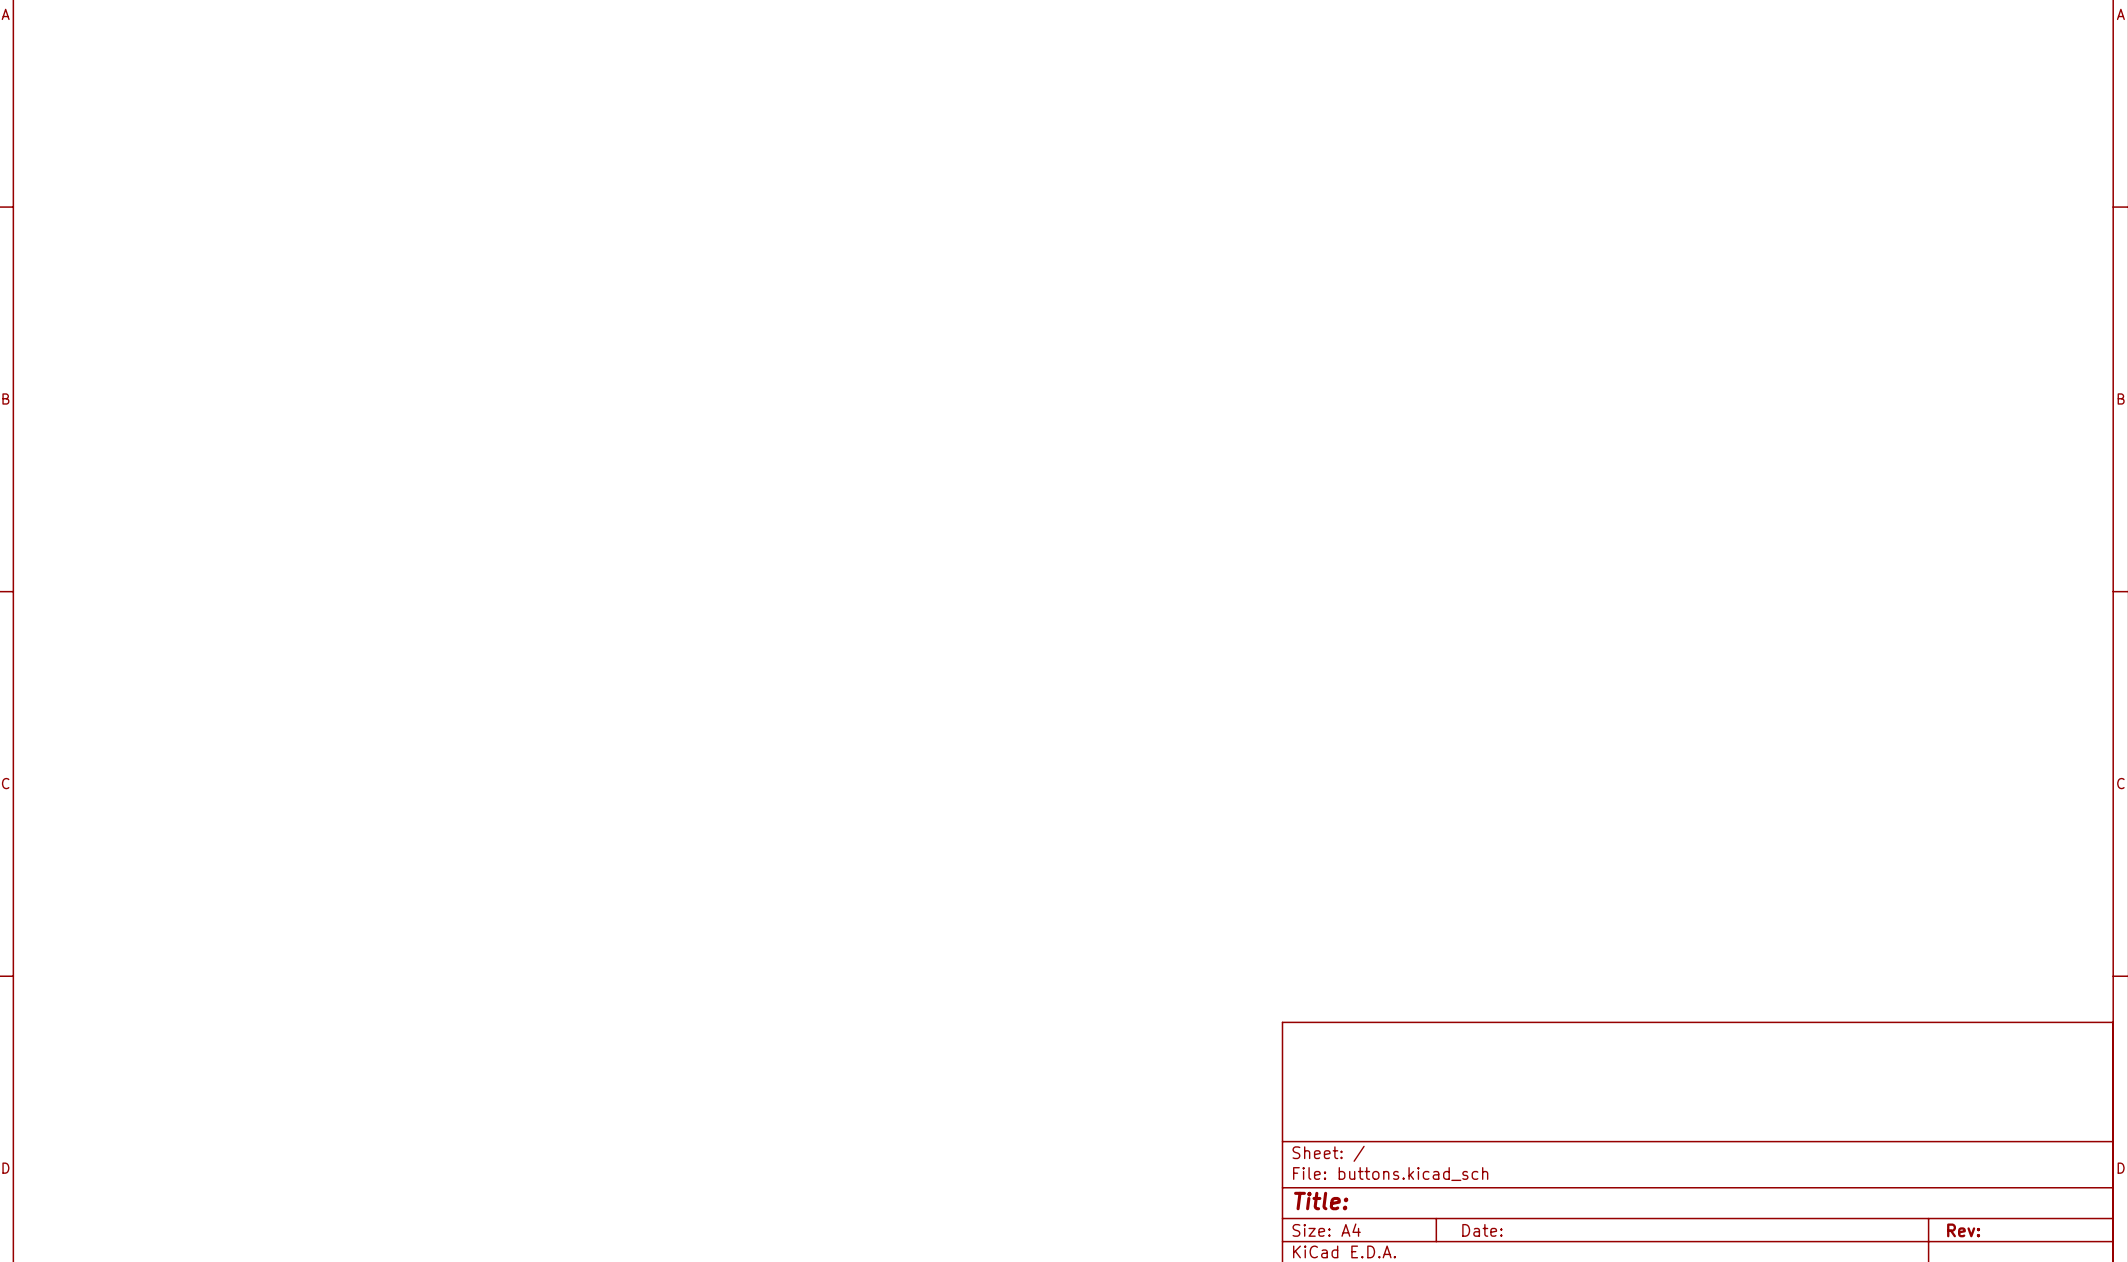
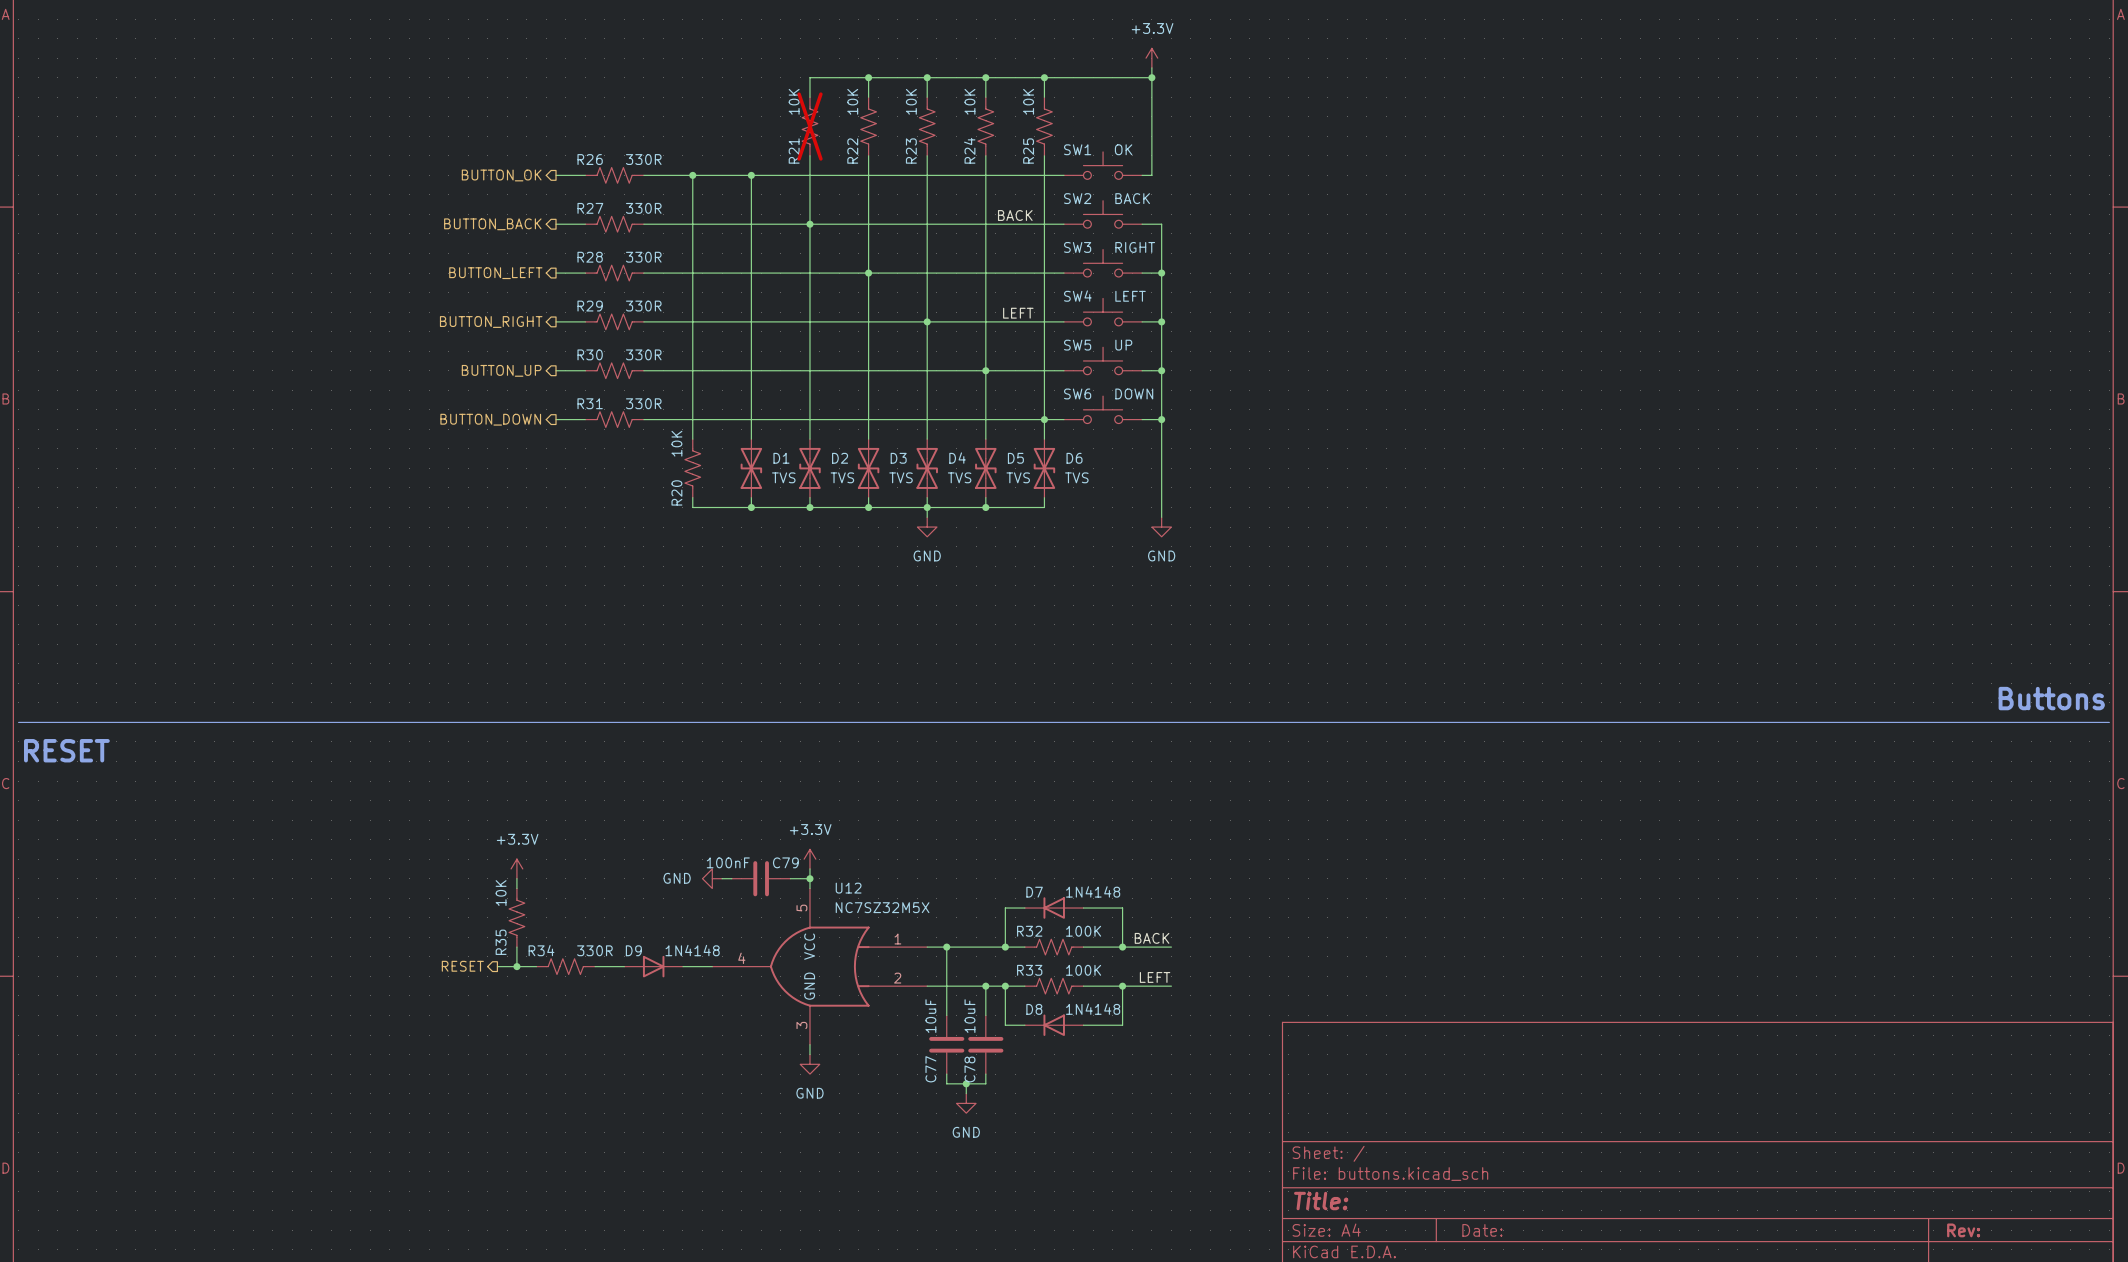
power symbol: none -> +3.3V (1151, 58)
wire: none -> (1151, 67) (1151, 175) (1142, 175)
wire: none -> (868, 77) (868, 97)
junction: none -> (868, 77)
wire: none -> (927, 77) (927, 97)
junction: none -> (927, 77)
wire: none -> (985, 77) (985, 97)
junction: none -> (985, 77)
wire: none -> (1044, 77) (1044, 97)
junction: none -> (1044, 77)
wire: none -> (1151, 77) (809, 77) (809, 97)
junction: none -> (1151, 77)
R21: none -> 10K (809, 126)
R22: none -> 10K (868, 126)
R23: none -> 10K (927, 126)
R24: none -> 10K (985, 126)
R25: none -> 10K (1044, 126)
wire: none -> (809, 155) (809, 439)
wire: none -> (868, 155) (868, 439)
wire: none -> (927, 155) (927, 439)
wire: none -> (985, 155) (985, 439)
wire: none -> (1044, 155) (1044, 439)
SW1: none -> OK (1103, 165)
hierarchical label: none -> BUTTON_OK (501, 175)
wire: none -> (556, 175) (585, 175)
R26: none -> 330R (614, 175)
wire: none -> (643, 175) (1063, 175)
wire: none -> (692, 175) (692, 439)
junction: none -> (692, 175)
wire: none -> (751, 175) (751, 439)
junction: none -> (751, 175)
SW2: none -> BACK (1103, 214)
label: none -> BACK (1015, 215)
hierarchical label: none -> BUTTON_BACK (492, 224)
wire: none -> (556, 224) (585, 224)
R27: none -> 330R (614, 224)
wire: none -> (643, 224) (1063, 224)
junction: none -> (809, 224)
wire: none -> (1142, 224) (1161, 224) (1161, 517)
SW3: none -> RIGHT (1103, 263)
hierarchical label: none -> BUTTON_LEFT (495, 273)
wire: none -> (556, 273) (585, 273)
R28: none -> 330R (614, 273)
wire: none -> (643, 273) (1063, 273)
junction: none -> (868, 273)
wire: none -> (1142, 273) (1161, 273)
junction: none -> (1161, 273)
SW4: none -> LEFT (1103, 312)
label: none -> LEFT (1018, 313)
wire: none -> (556, 321) (585, 321)
R29: none -> 330R (614, 321)
wire: none -> (643, 321) (1063, 321)
junction: none -> (927, 321)
wire: none -> (1142, 321) (1161, 321)
junction: none -> (1161, 321)
hierarchical label: none -> BUTTON_RIGHT (491, 322)
SW5: none -> UP (1103, 360)
hierarchical label: none -> BUTTON_UP (501, 370)
wire: none -> (556, 370) (585, 370)
R30: none -> 330R (614, 370)
wire: none -> (643, 370) (1063, 370)
junction: none -> (985, 370)
wire: none -> (1142, 370) (1161, 370)
junction: none -> (1161, 370)
SW6: none -> DOWN (1103, 409)
hierarchical label: none -> BUTTON_DOWN (490, 419)
wire: none -> (556, 419) (585, 419)
R31: none -> 330R (614, 419)
wire: none -> (643, 419) (1063, 419)
junction: none -> (1044, 419)
wire: none -> (1142, 419) (1161, 419)
junction: none -> (1161, 419)
R20: none -> 10K (692, 468)
D1: none -> TVS (751, 468)
D2: none -> TVS (809, 468)
D3: none -> TVS (868, 468)
D4: none -> TVS (927, 468)
D5: none -> TVS (985, 468)
D6: none -> TVS (1044, 468)
wire: none -> (692, 497) (692, 507) (1044, 507) (1044, 497)
wire: none -> (751, 497) (751, 507)
wire: none -> (809, 497) (809, 507)
wire: none -> (868, 497) (868, 507)
wire: none -> (927, 497) (927, 517)
wire: none -> (985, 497) (985, 507)
junction: none -> (751, 507)
junction: none -> (809, 507)
junction: none -> (868, 507)
junction: none -> (927, 507)
junction: none -> (985, 507)
power symbol: none -> GND (927, 527)
power symbol: none -> GND (1161, 527)
text: none -> Buttons (2051, 698)
line: none -> (18, 722) (2109, 722)
text: none -> RESET (66, 750)
power symbol: none -> +3.3V (809, 859)
power symbol: none -> +3.3V (516, 868)
wire: none -> (809, 868) (809, 888)
wire: none -> (516, 878) (516, 888)
power symbol: none -> GND (712, 878)
wire: none -> (722, 878) (731, 878)
C79: none -> 100nF (761, 878)
wire: none -> (790, 878) (809, 878)
junction: none -> (809, 878)
wire: none -> (1024, 908) (1005, 908) (1005, 947)
D7: none -> 1N4148 (1054, 908)
wire: none -> (1083, 908) (1122, 908) (1122, 947)
R35: none -> 10K (516, 917)
label: none -> BACK (1152, 938)
wire: none -> (516, 947) (516, 966)
wire: none -> (927, 947) (1024, 947)
wire: none -> (946, 947) (946, 1015)
junction: none -> (946, 947)
junction: none -> (1005, 947)
R32: none -> 100K (1054, 947)
wire: none -> (1083, 947) (1171, 947)
junction: none -> (1122, 947)
hierarchical label: none -> RESET (462, 966)
wire: none -> (497, 966) (536, 966)
junction: none -> (516, 966)
R34: none -> 330R (565, 966)
wire: none -> (595, 966) (624, 966)
D9: none -> 1N4148 (653, 966)
wire: none -> (682, 966) (712, 966)
U12: none -> NC7SZ32M5X (819, 966)
label: none -> LEFT (1155, 977)
wire: none -> (927, 986) (1024, 986)
wire: none -> (985, 986) (985, 1015)
junction: none -> (985, 986)
wire: none -> (1005, 986) (1005, 1025) (1024, 1025)
junction: none -> (1005, 986)
R33: none -> 100K (1054, 986)
wire: none -> (1083, 986) (1171, 986)
wire: none -> (1122, 986) (1122, 1025) (1083, 1025)
junction: none -> (1122, 986)
D8: none -> 1N4148 (1054, 1025)
wire: none -> (809, 1044) (809, 1054)
C77: none -> 10uF (946, 1044)
C78: none -> 10uF (985, 1044)
power symbol: none -> GND (809, 1064)
wire: none -> (946, 1074) (946, 1083) (985, 1083) (985, 1074)
wire: none -> (966, 1083) (966, 1093)
junction: none -> (966, 1083)
power symbol: none -> GND (966, 1103)

